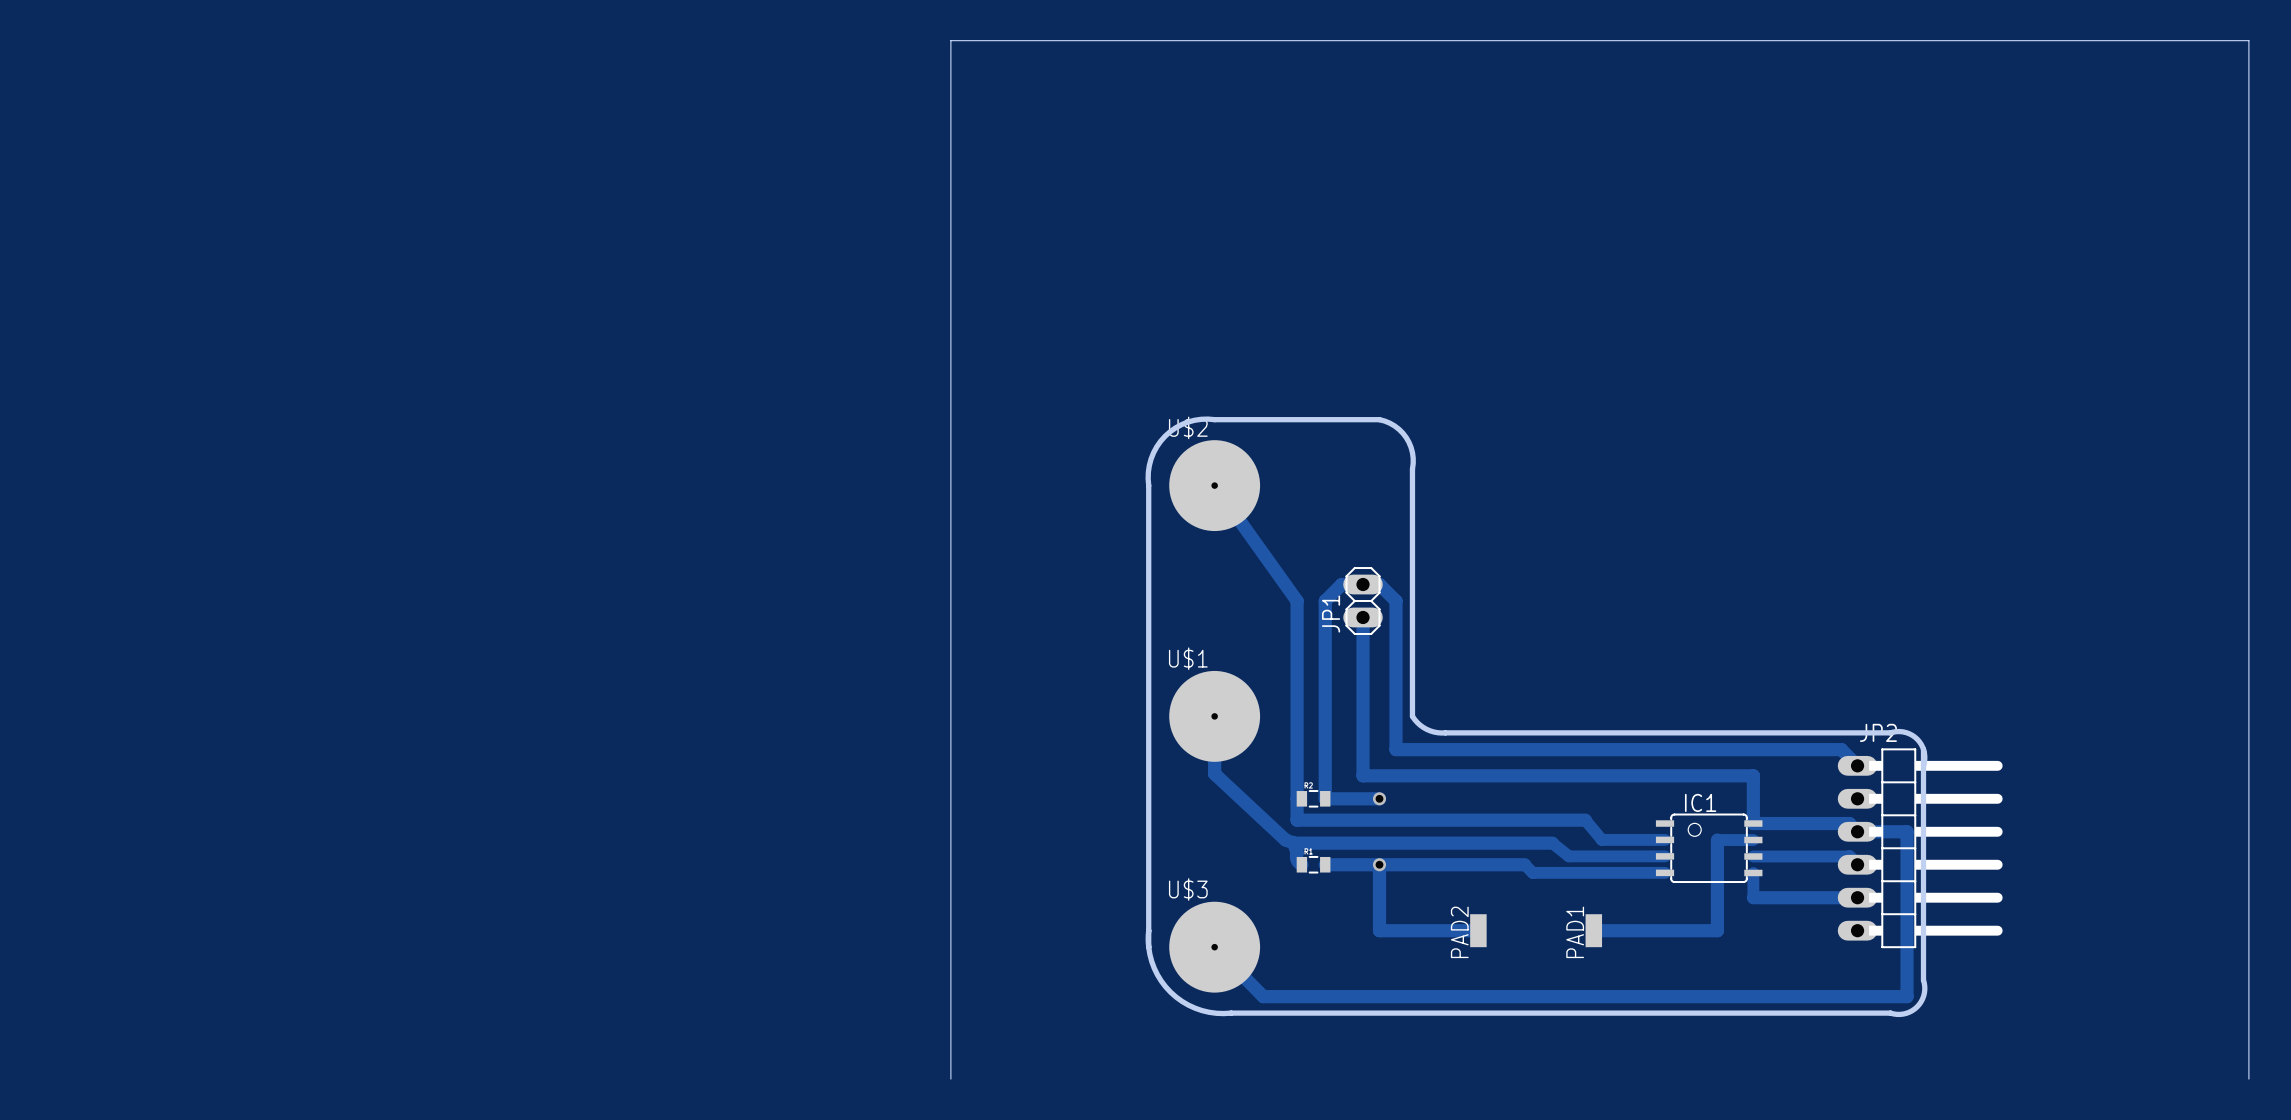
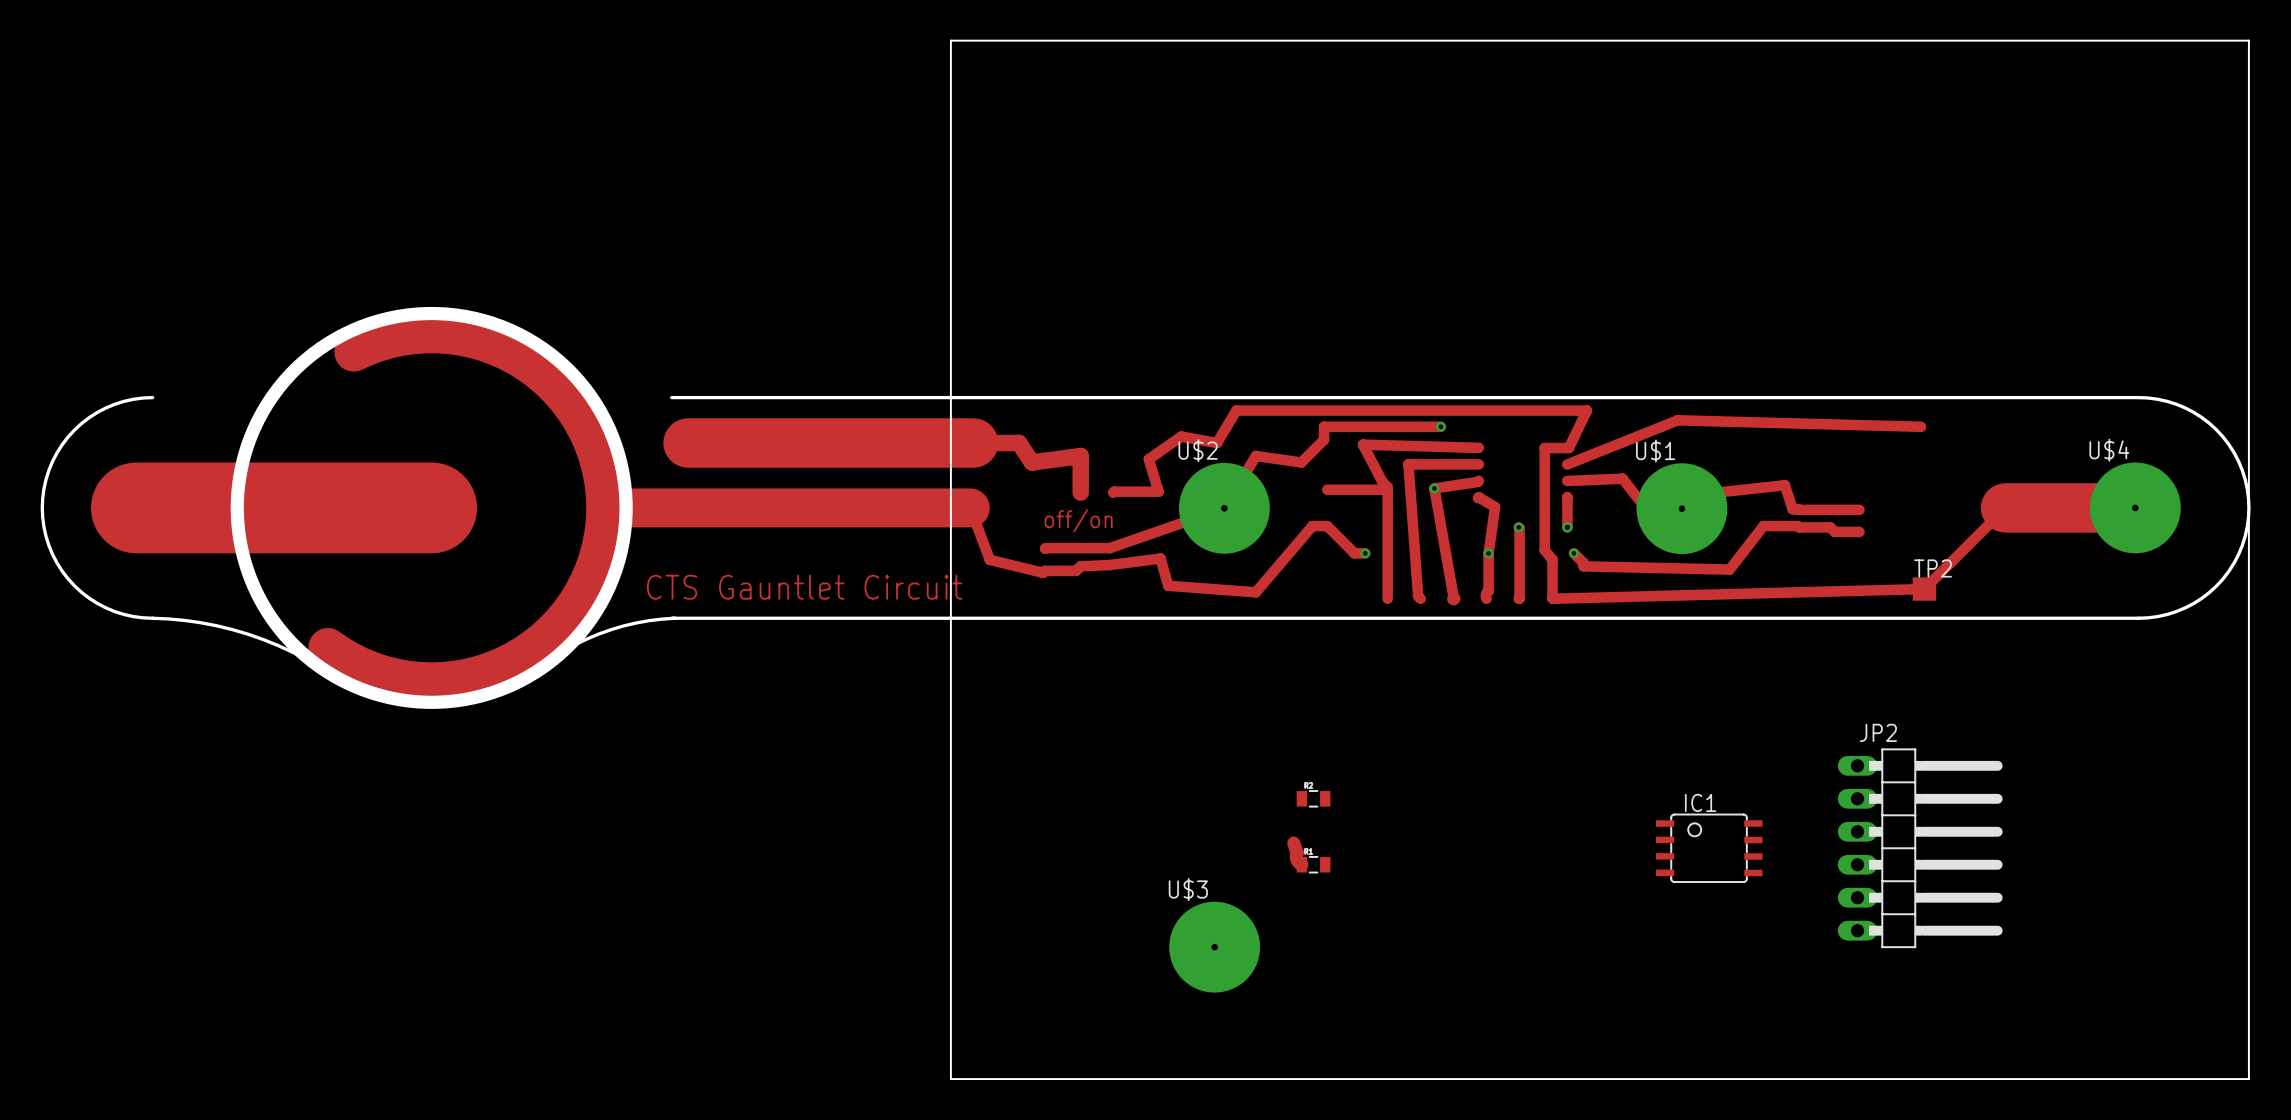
round board edge: none -> [230, 306, 633, 709]
track: none -> (353, 352) (376, 342) (400, 336) (424, 333) (449, 334) (485, 342) (508, 351) (529, 363) (548, 379) (565, 396) (586, 427) (595, 450) (602, 474) (605, 498) (605, 523) (601, 547) (593, 570) (577, 603) (562, 623) (544, 640) (524, 654) (502, 666) (479, 675) (455, 680) (431, 681) (406, 680) (382, 674) (359, 666) (327, 647)
board edge: none -> (152, 397) (133, 399) (114, 404) (97, 412) (81, 423) (62, 444) (52, 461) (46, 479) (42, 498) (42, 517) (46, 536) (52, 554) (62, 571) (74, 585) (89, 598) (105, 607) (133, 616) (200, 622) (247, 634) (292, 652) (357, 687) (382, 695) (420, 701) (459, 699) (497, 690) (520, 679) (564, 650) (599, 633) (636, 622) (675, 618)
board edge: none -> (671, 397) (2148, 398) (2167, 401) (2185, 407) (2209, 423) (2223, 437) (2234, 452) (2242, 470) (2247, 488) (2248, 507) (2247, 527) (2242, 545) (2234, 563) (2223, 578) (2209, 592) (2185, 607) (2167, 614) (2148, 617) (671, 618)
track: none -> (1440, 426) (1324, 426) (1324, 439) (1301, 462) (1255, 456) (1224, 508) (1109, 548) (1045, 548)
via: none -> (1440, 426)
track: none -> (1921, 426) (1677, 420) (1567, 464)
track: none -> (688, 443) (1019, 443) (1032, 462) (1080, 456) (1080, 492)
track: none -> (1478, 447) (1363, 444) (1382, 481) (1387, 487) (1387, 598)
track: none -> (1478, 464) (1408, 464) (1418, 596) (1420, 598)
track: none -> (1478, 480) (1434, 488) (1453, 598)
track: none -> (1567, 480) (1622, 478) (1646, 508) (1681, 508) (1695, 494) (1784, 485) (1792, 509) (1859, 509)
track: (1214, 485) (1297, 600) (1297, 820) (1585, 820) (1601, 839) (1665, 839) -> none
U$2 position: (1214, 485) -> (1224, 508)
via: none -> (1434, 488)
track: none -> (1327, 489) (1385, 489) (1387, 491)
track: none -> (1113, 492) (1158, 491) (1148, 459) (1181, 436) (1216, 443) (1236, 410) (1586, 410) (1568, 448) (1544, 448) (1544, 550) (1552, 559) (1552, 598) (1924, 589) (2005, 507) (2135, 507)
track: none -> (1567, 497) (1567, 527)
track: none -> (1478, 498) (1495, 507) (1488, 553) (1488, 591) (1486, 594) (1486, 598)
track: none -> (136, 507) (431, 507)
track: none -> (606, 507) (970, 507) (989, 559) (1043, 572) (1045, 570) (1076, 570) (1080, 566) (1109, 565) (1160, 558) (1168, 585) (1255, 592) (1312, 526) (1327, 526) (1354, 553) (1365, 553)
U$4: none -> (2135, 507)
text: none -> off/on (1078, 520)
track: none -> (1518, 527) (1518, 598)
via: none -> (1518, 527)
via: none -> (1567, 527)
track: none -> (1859, 531) (1834, 531) (1830, 527) (1763, 526) (1729, 569) (1583, 566) (1583, 563) (1573, 553)
via: none -> (1365, 553)
via: none -> (1488, 553)
via: none -> (1573, 553)
text: none -> CTS Gauntlet Circuit (804, 587)
TP2: none -> (1924, 589)
JP1: (1363, 600) -> none
track: (1363, 617) (1363, 775) (1753, 775) (1753, 823) (1849, 823) (1857, 831) (1907, 831) (1907, 996) (1263, 996) (1214, 947) -> none
track: (1214, 716) (1214, 773) (1285, 839) (1293, 843) (1552, 843) (1568, 856) (1665, 856) -> none
U$1 position: (1214, 716) -> (1681, 508)
board edge: (1923, 749) (1924, 989) (1919, 1004) (1906, 1013) (1216, 1013) (1195, 1008) (1170, 992) (1157, 974) (1148, 947) -> none
track: (1857, 765) (1841, 749) (1395, 749) (1395, 600) (1379, 584) (1341, 584) (1325, 600) (1325, 798) (1379, 798) -> none
board edge: (1923, 765) (1924, 753) (1921, 744) (1912, 735) (1900, 731) (1441, 733) (1426, 729) (1412, 716) (1413, 458) (1406, 437) (1394, 425) (1379, 419) (1194, 420) (1175, 427) (1160, 441) (1151, 458) (1148, 472) (1148, 947) -> none
via: (1379, 798) -> none
track: (1753, 840) (1717, 840) (1717, 930) (1593, 930) -> none
track: (1753, 856) (1849, 856) (1857, 864) -> none
track: (1325, 864) (1524, 864) (1532, 872) (1665, 872) -> none
track: (1379, 864) (1379, 930) (1478, 930) -> none
via: (1379, 864) -> none
track: (1753, 872) (1753, 897) (1857, 897) -> none
PAD2: (1478, 930) -> none
PAD1: (1593, 930) -> none
board edge: none -> (950, 1079) (2248, 1079)

